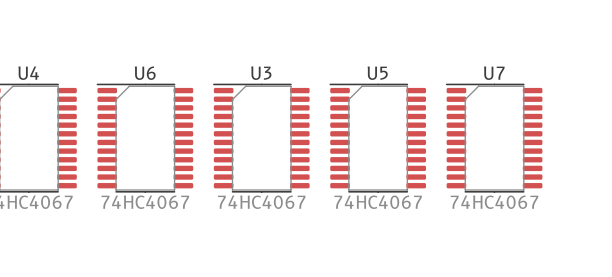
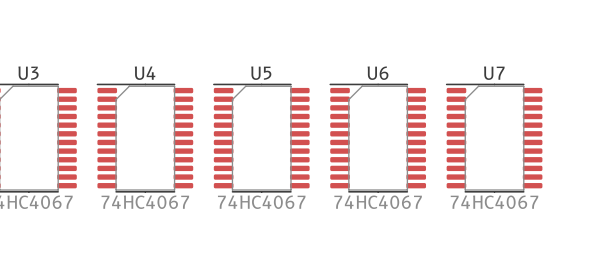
U4 name: U4 (28, 73) -> U3 (28, 73)
U6 name: U6 (145, 73) -> U4 (145, 73)
U3 name: U3 (261, 73) -> U5 (261, 73)
U5 name: U5 (377, 73) -> U6 (378, 73)

